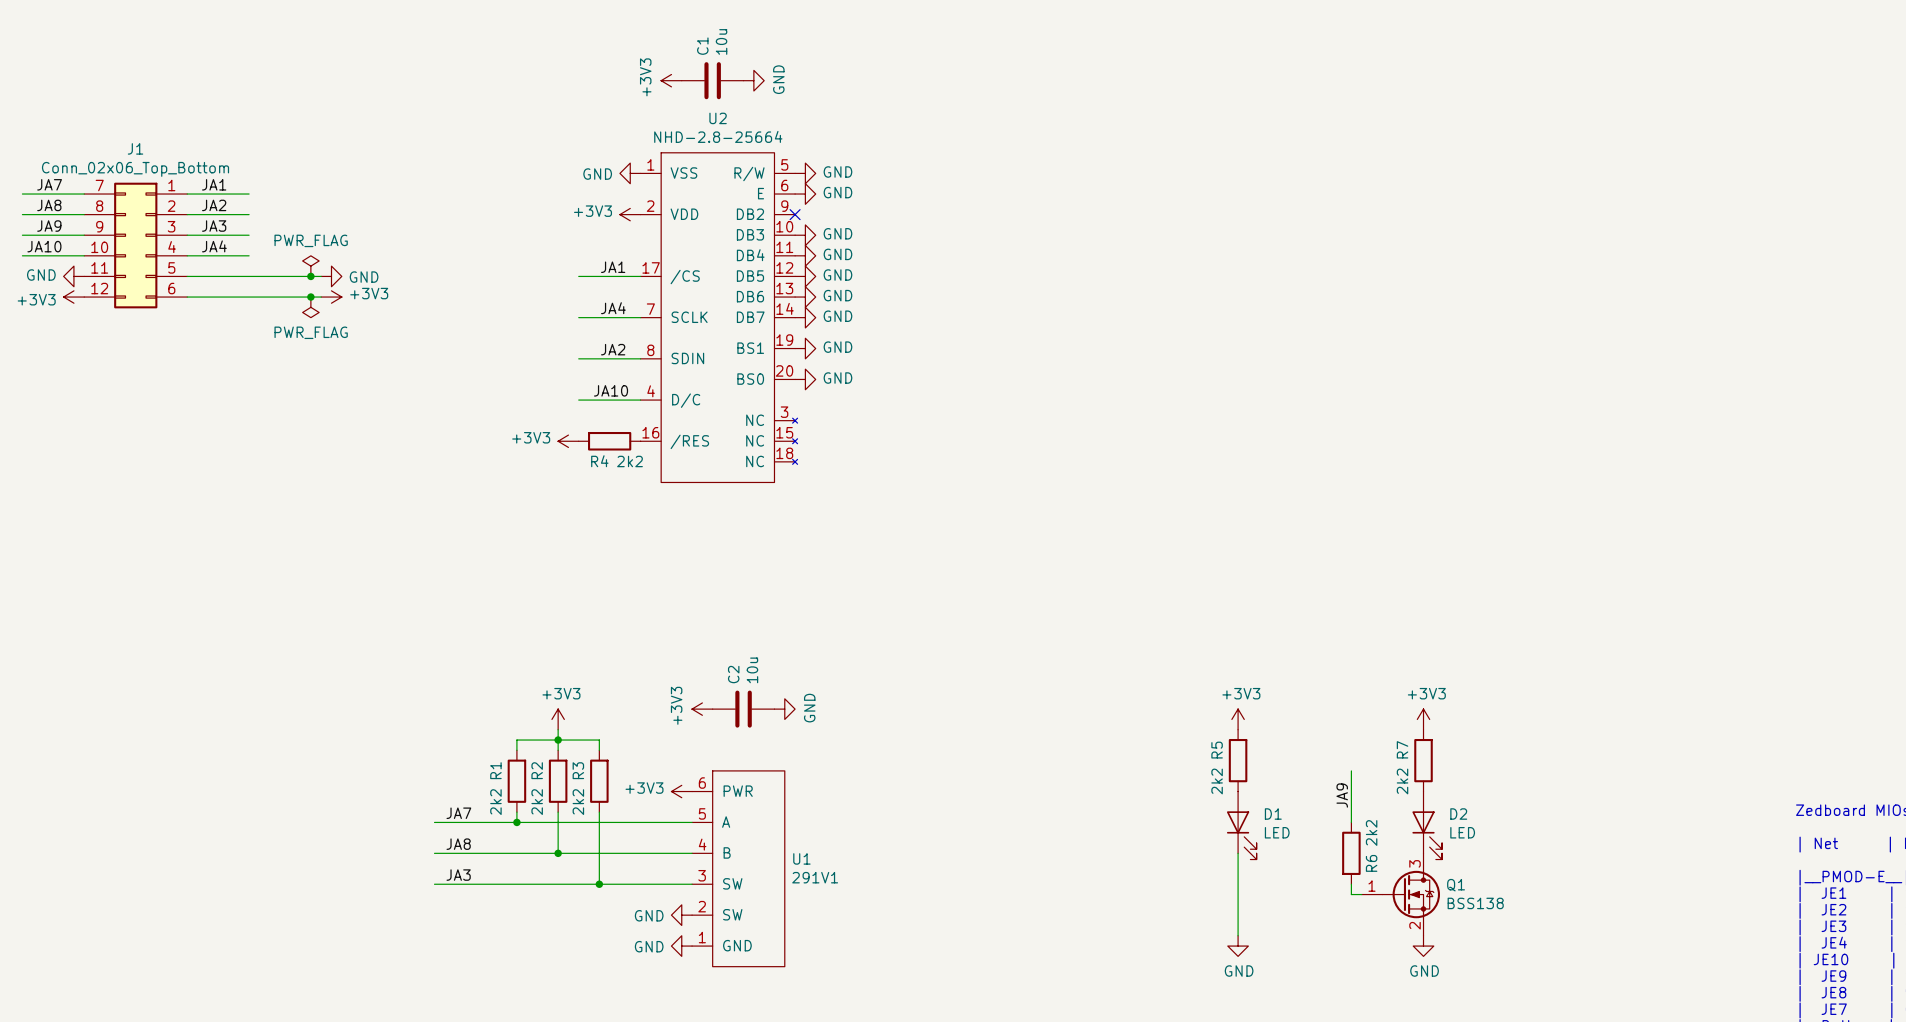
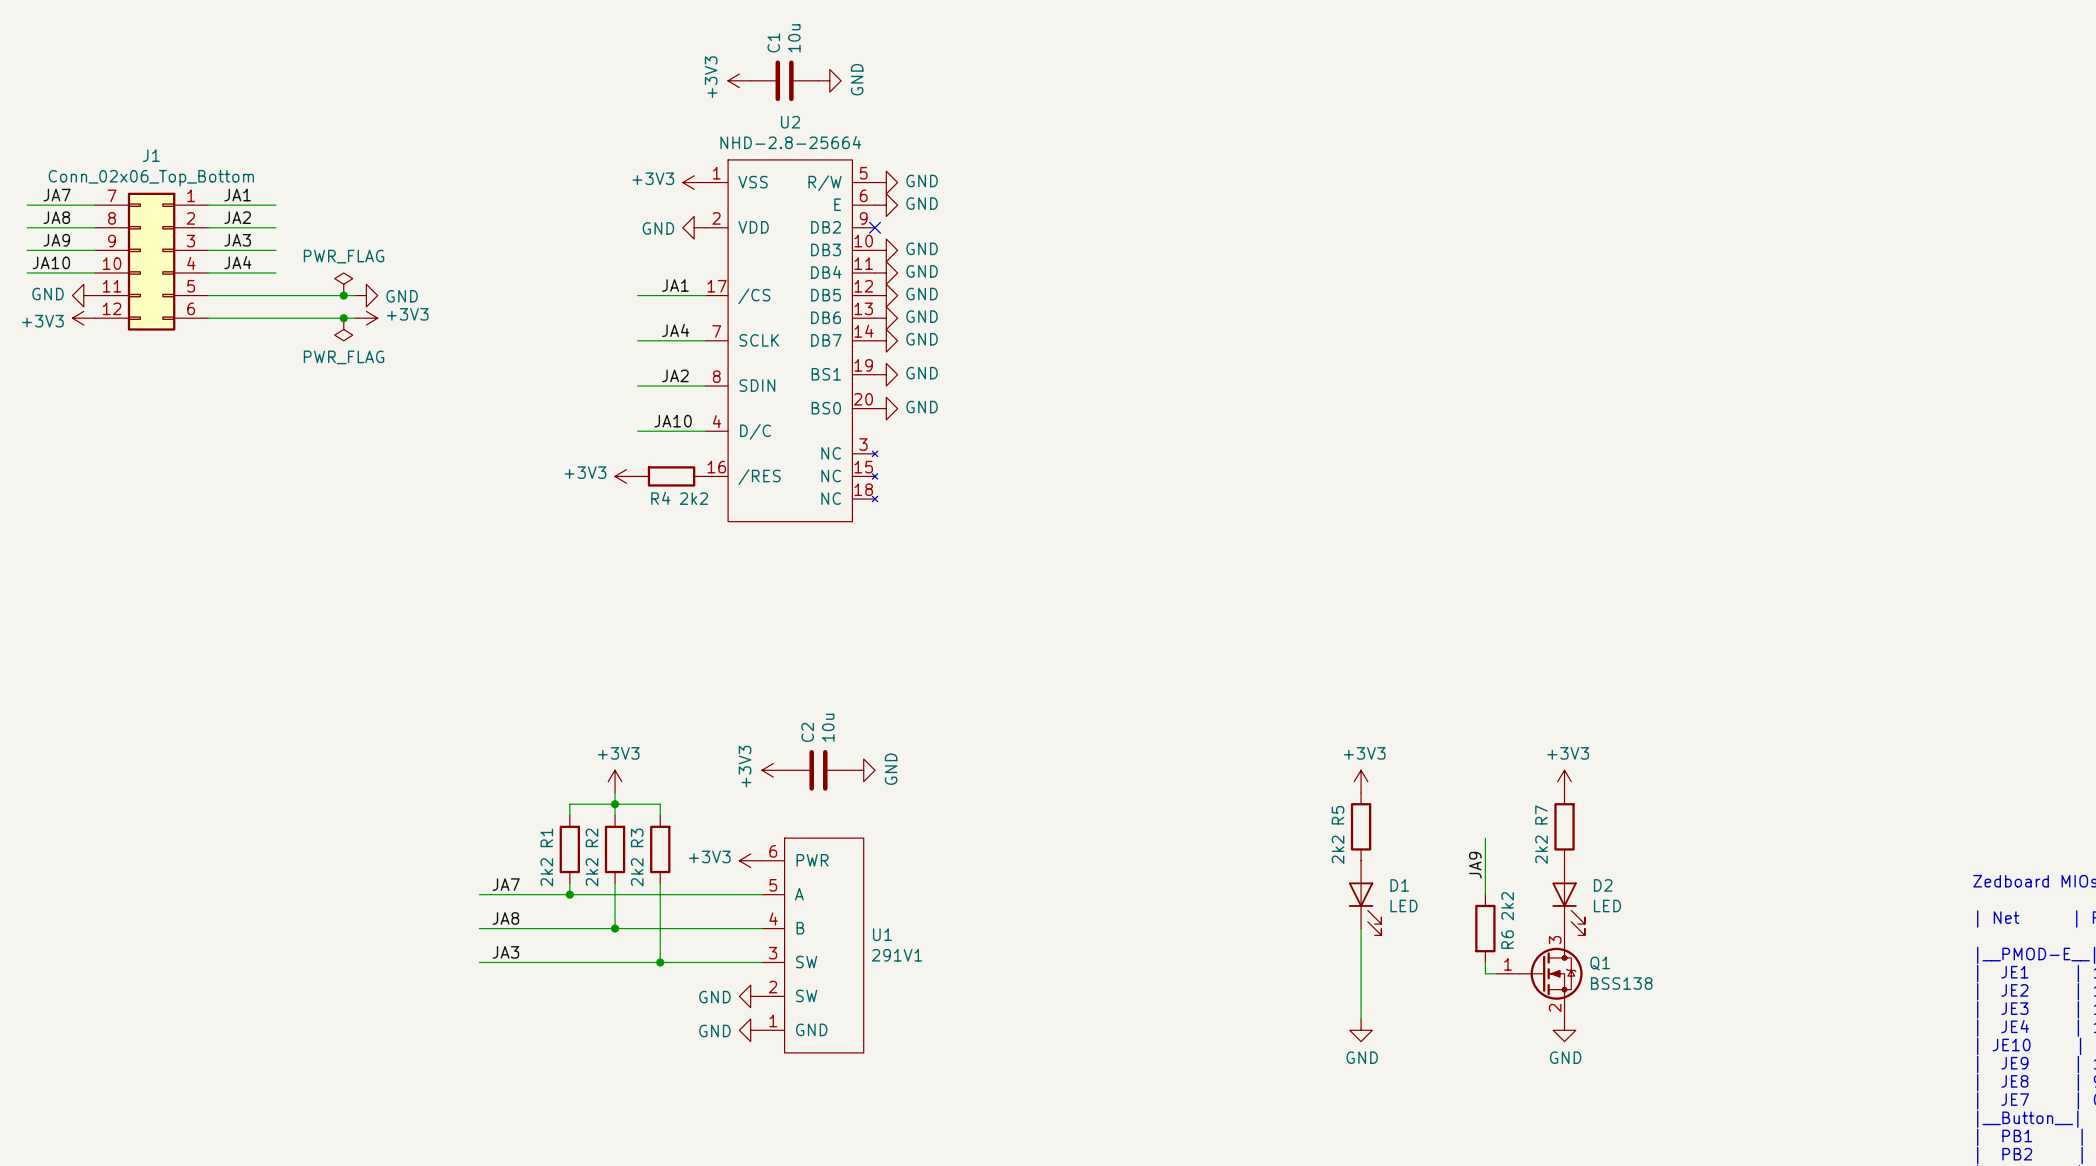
power symbol: GND (630, 173) -> +3V3 (694, 182)
power symbol: +3V3 (630, 214) -> GND (694, 227)

